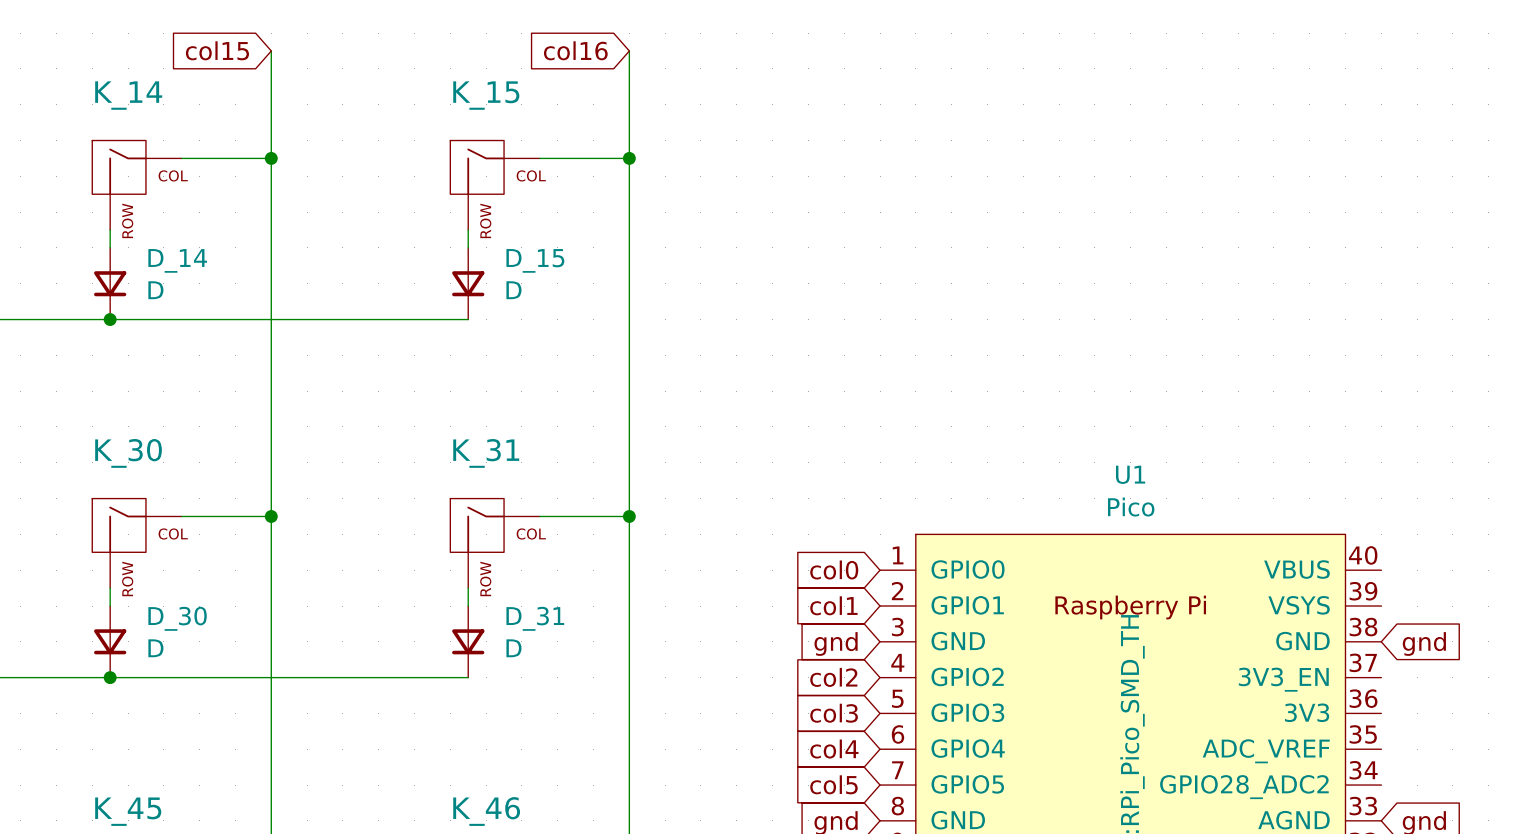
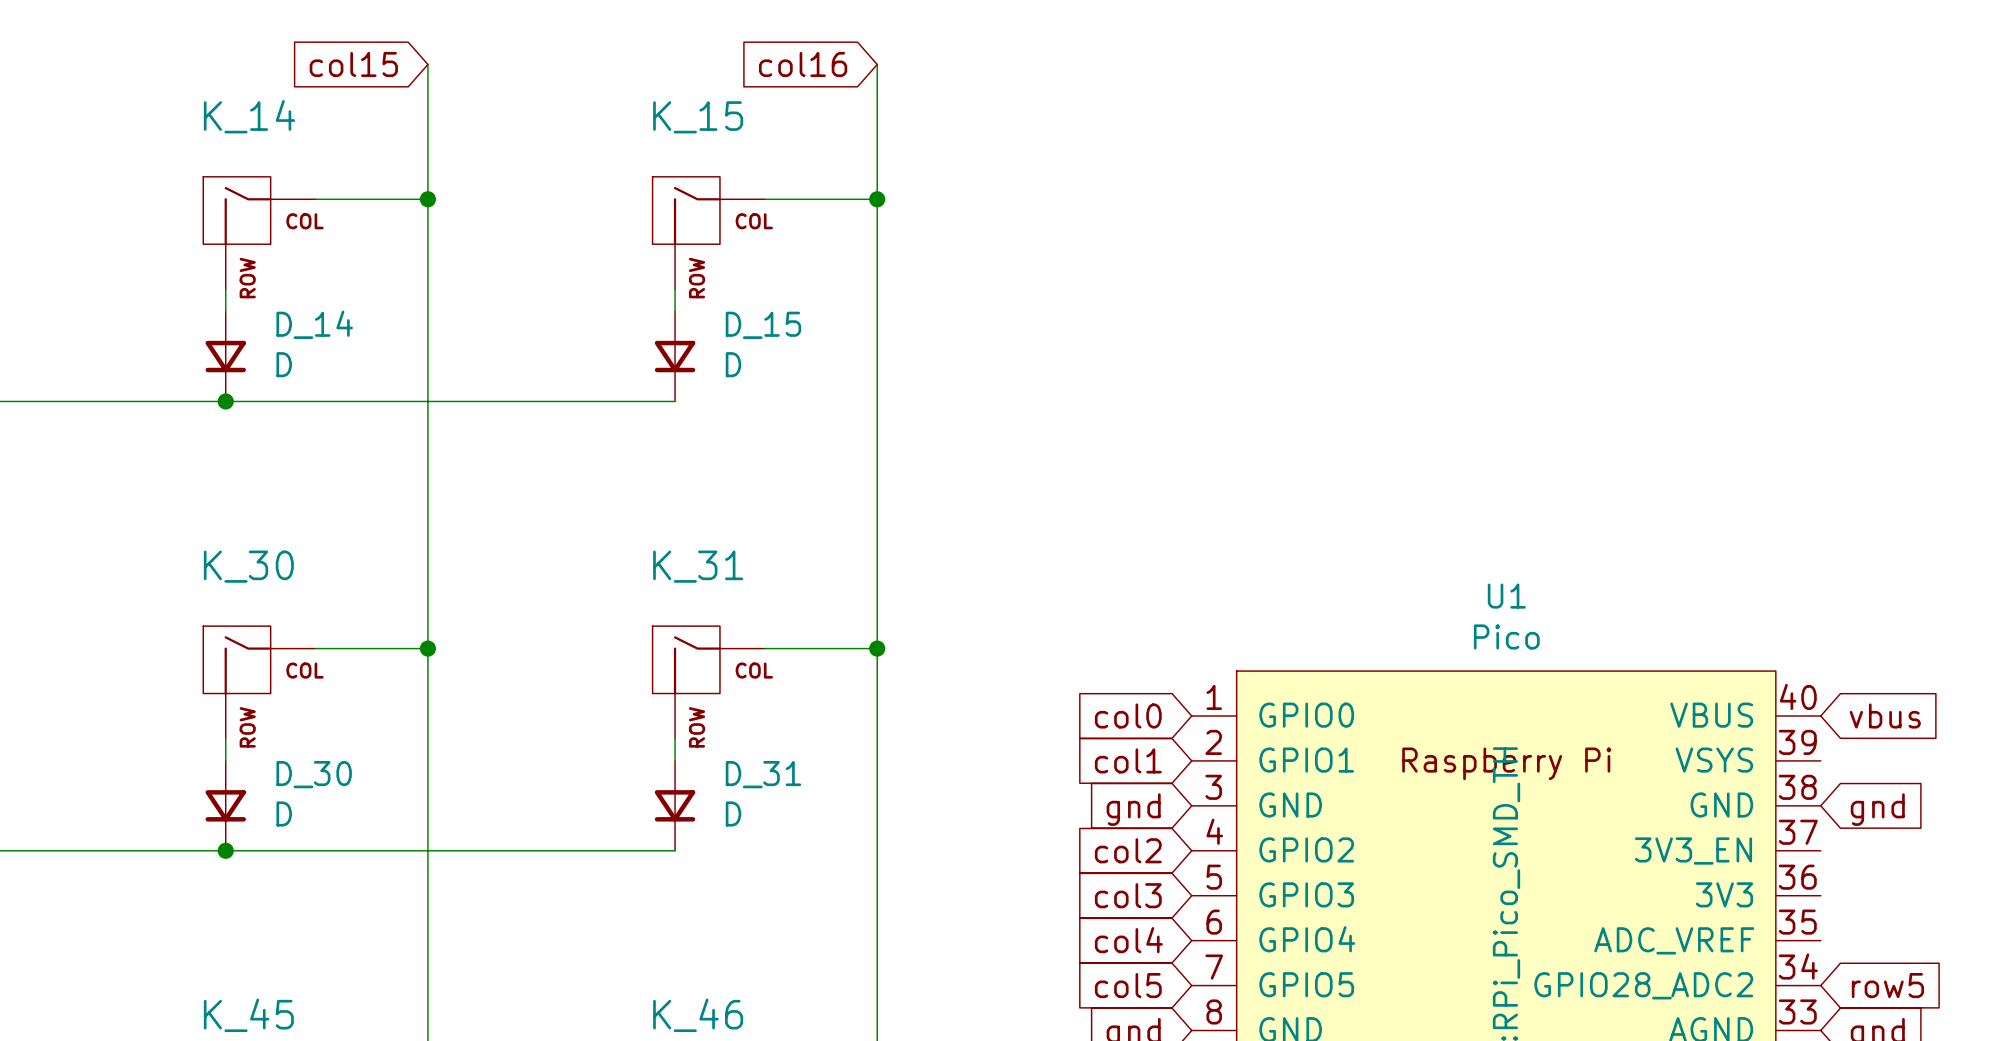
global label: none -> vbus (1885, 715)
global label: none -> row5 (1887, 985)

